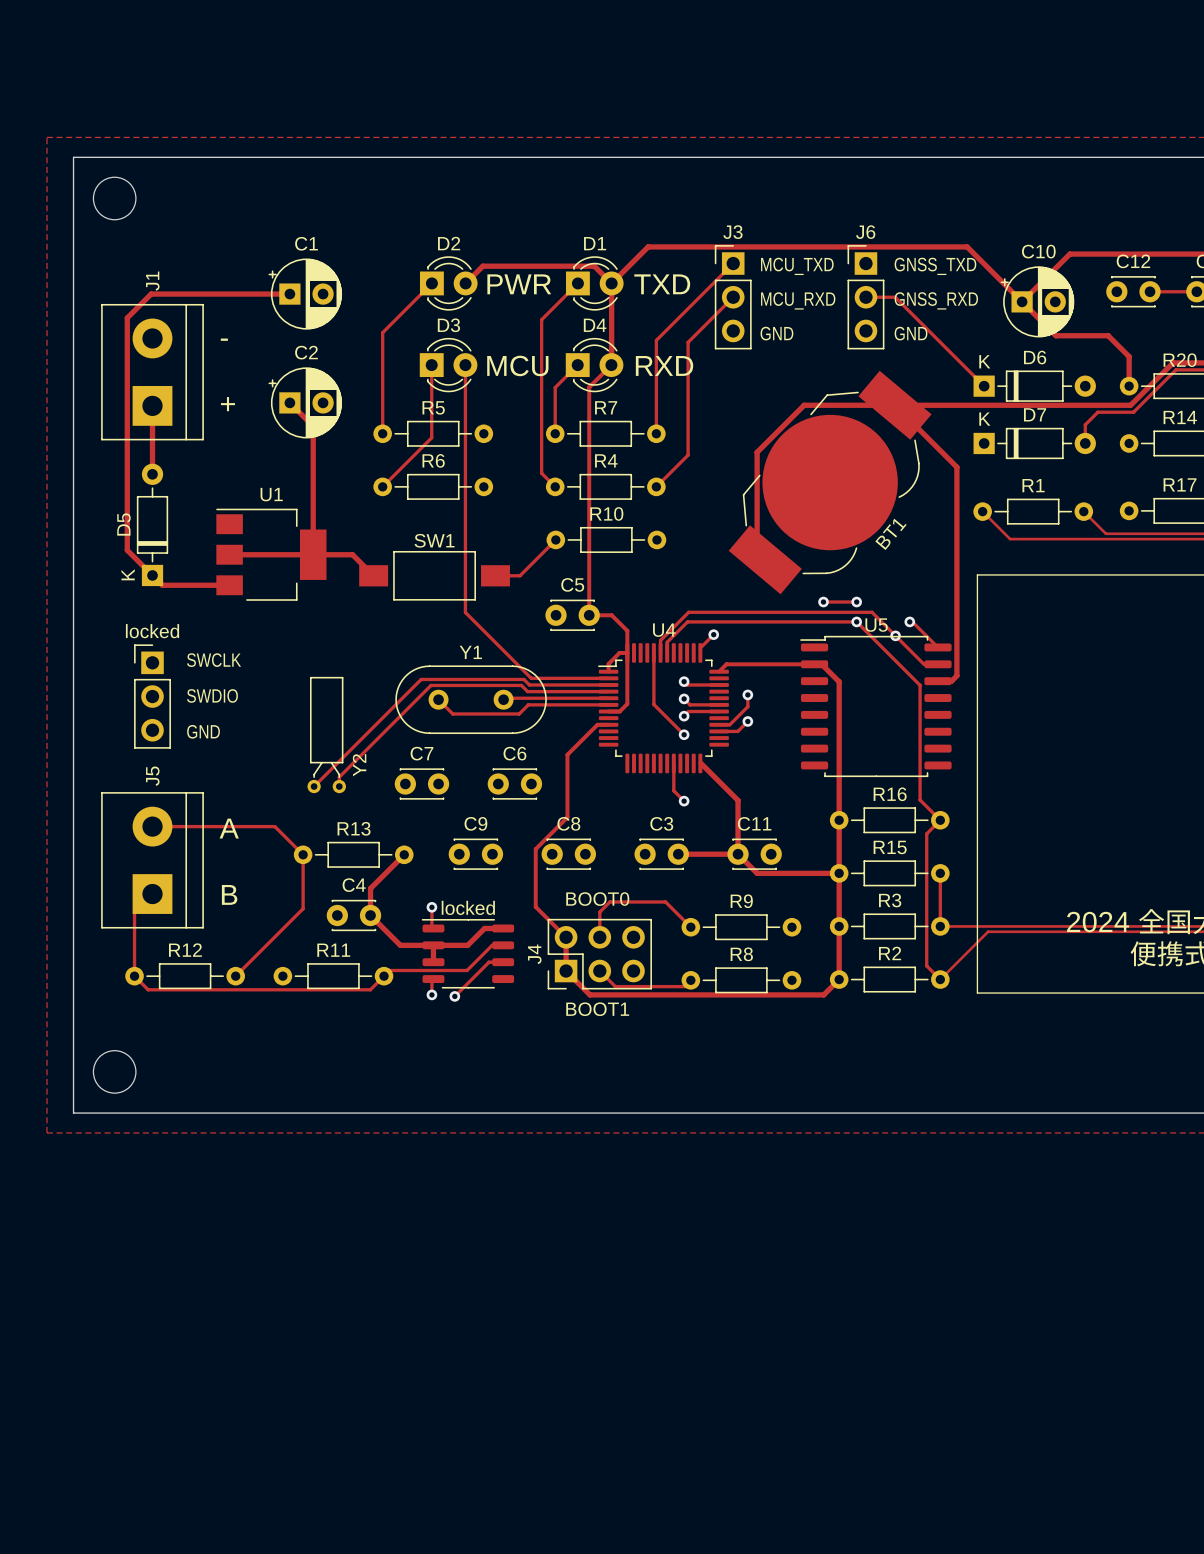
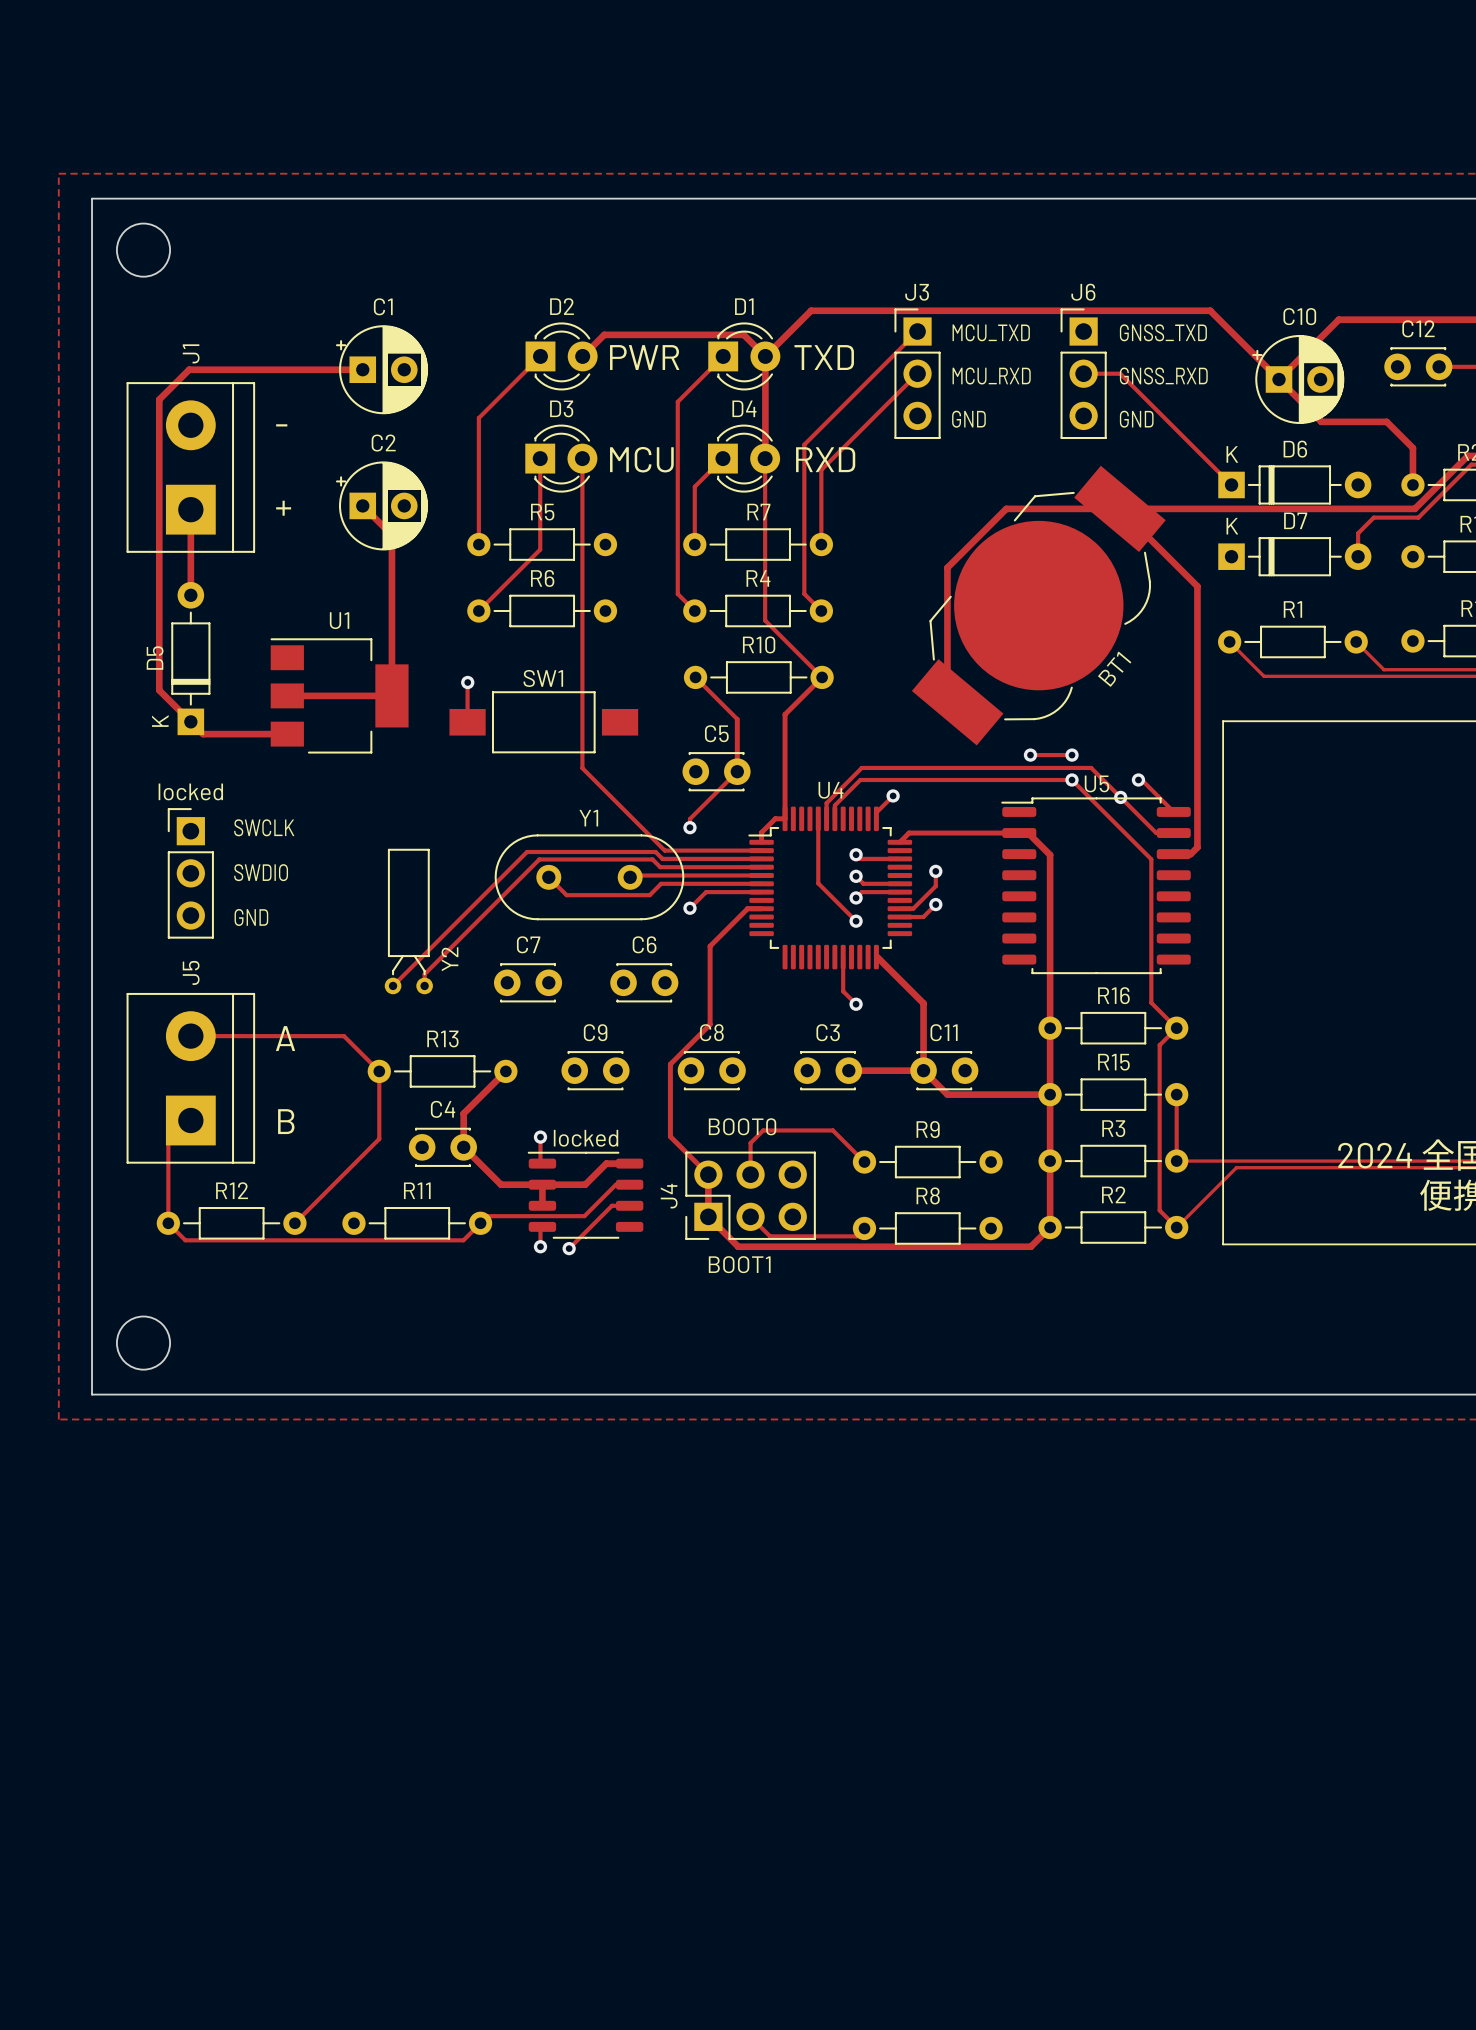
track: (656, 340) (656, 374) -> (861, 430) (821, 469)
track: (688, 342) (688, 455) (656, 486) -> (821, 427) (804, 444) (804, 593) (821, 610)
track: (611, 364) (589, 387) (589, 573) -> (765, 458) (765, 620) (822, 677) (785, 714) (785, 791)
track: (555, 539) (519, 575) (495, 575) -> (695, 677) (737, 719)
via: none -> (467, 682)
track: (313, 554) (352, 554) (373, 575) -> (467, 682) (467, 722)
track: (589, 615) (611, 615) (627, 630) -> (737, 771) (689, 819) (689, 827)
track: (627, 652) (627, 703) (619, 711) (608, 711) -> (689, 908) (706, 892) (761, 892)
via: none -> (689, 827)
via: none -> (689, 908)

